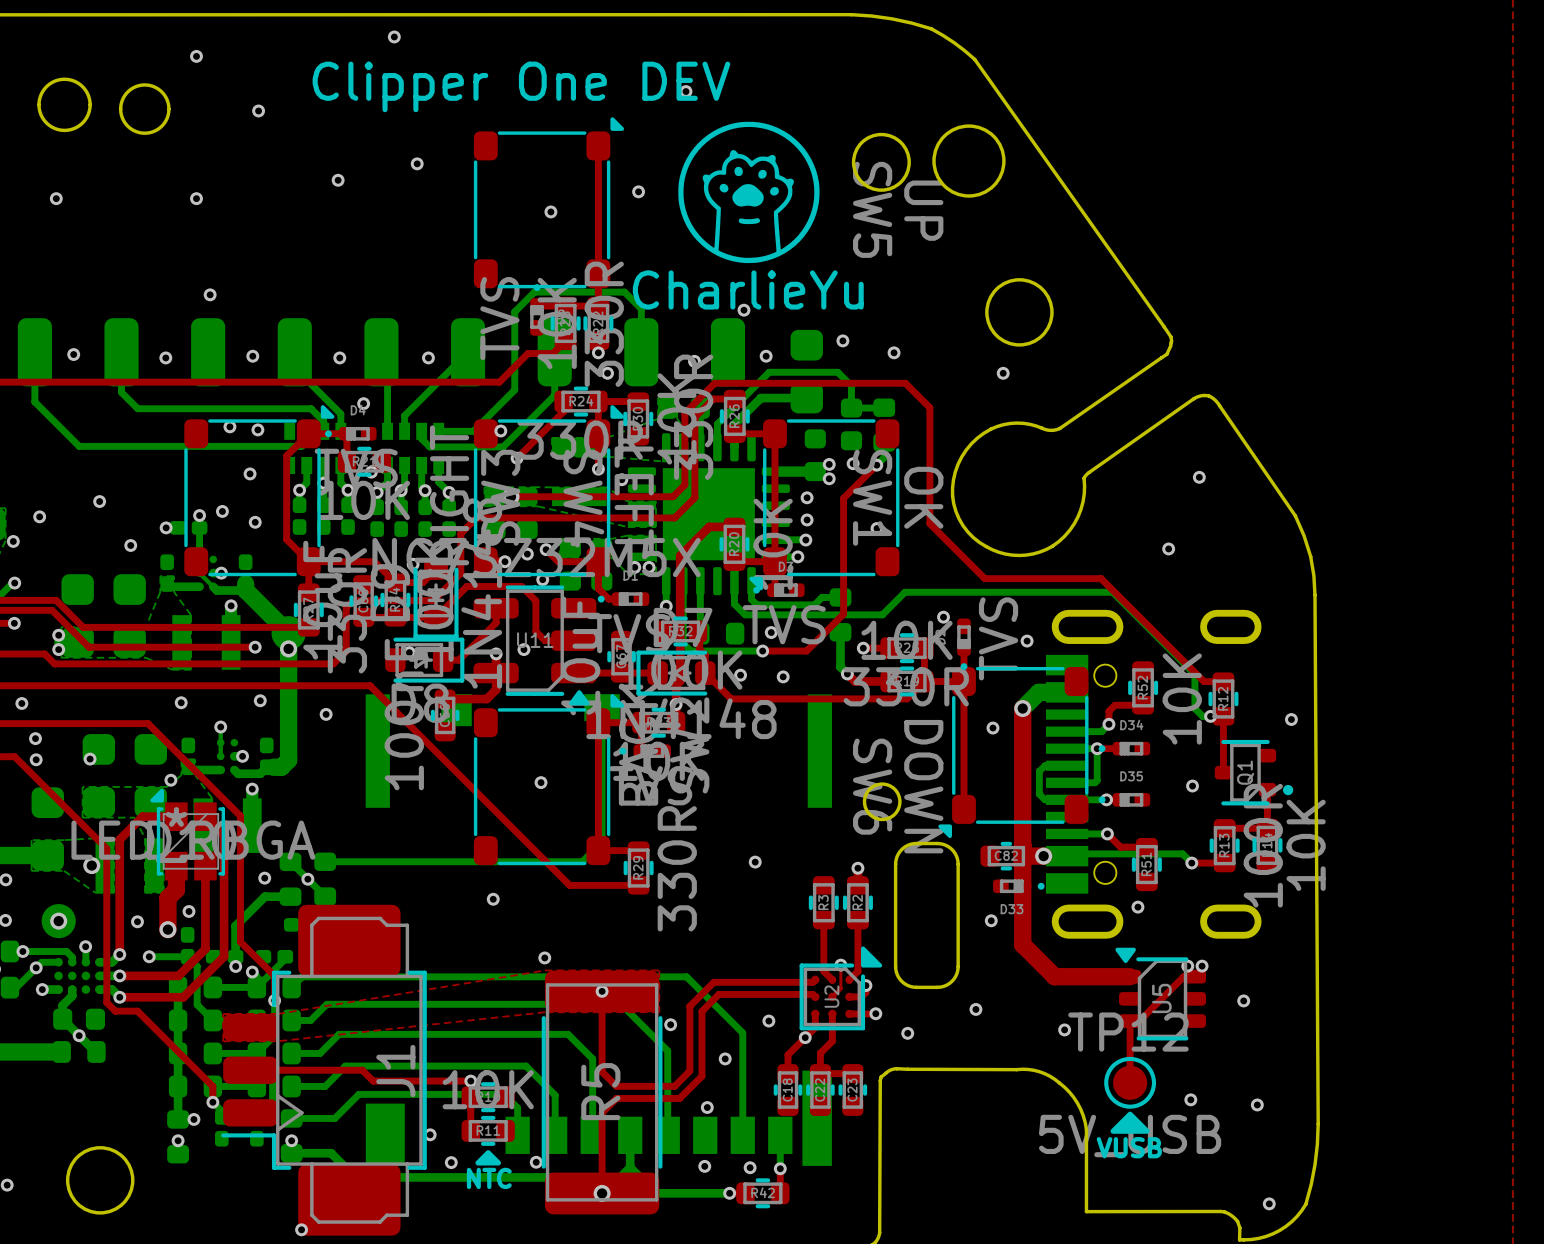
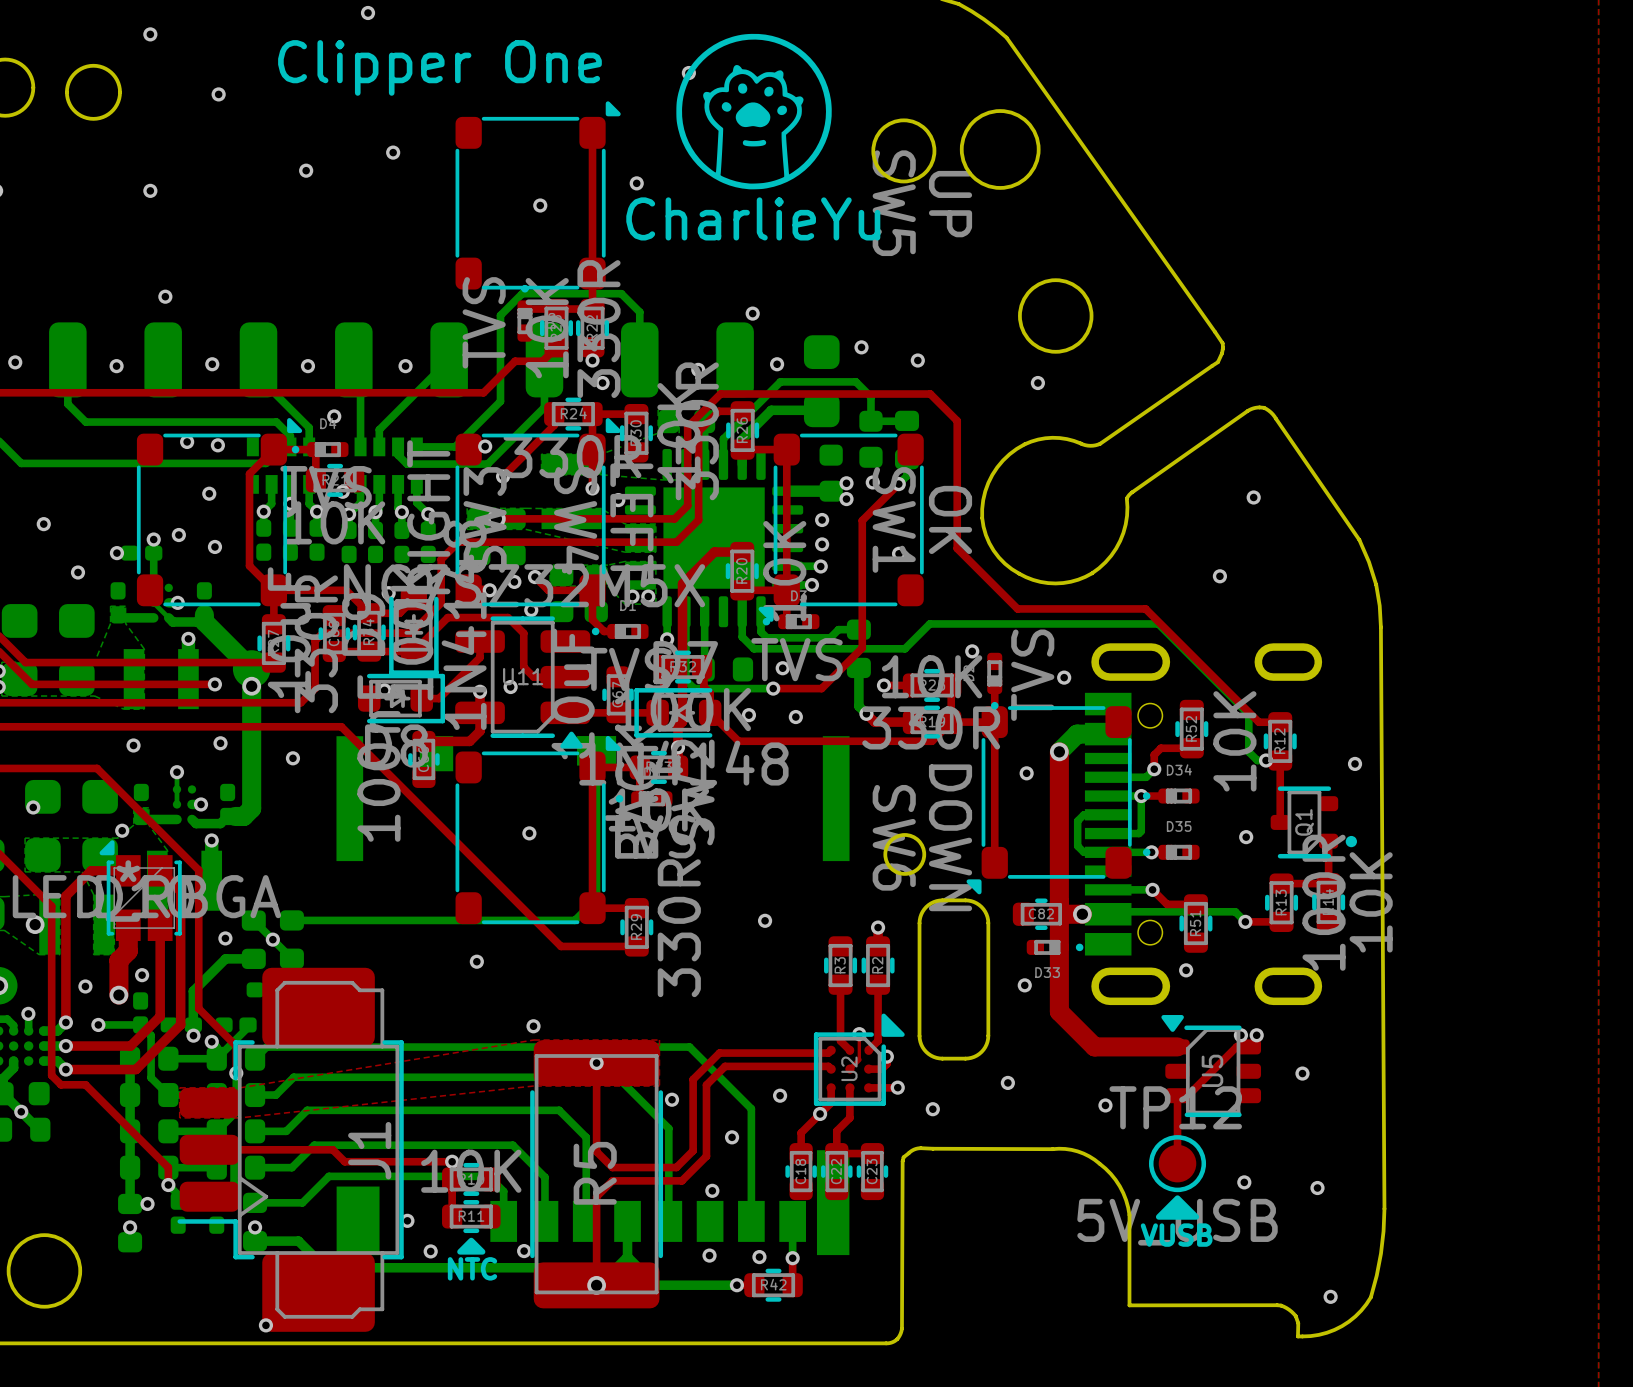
text: Clipper One DEV (521, 86) -> Clipper One (439, 67)
drawing position: (748, 192) -> (754, 111)

